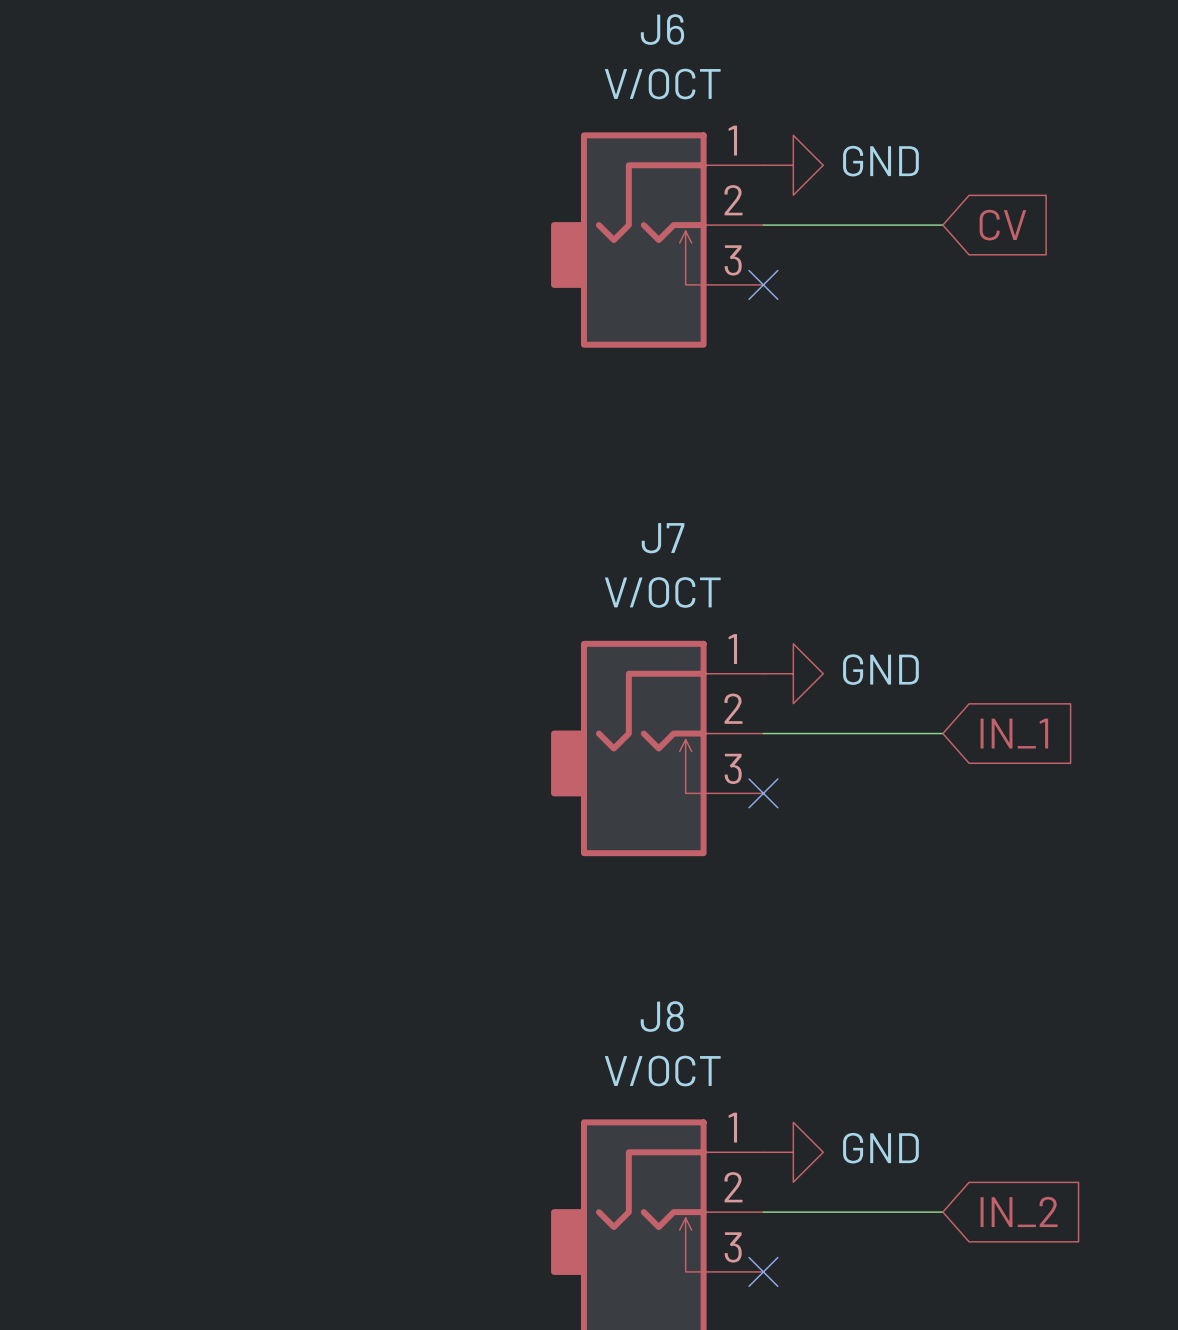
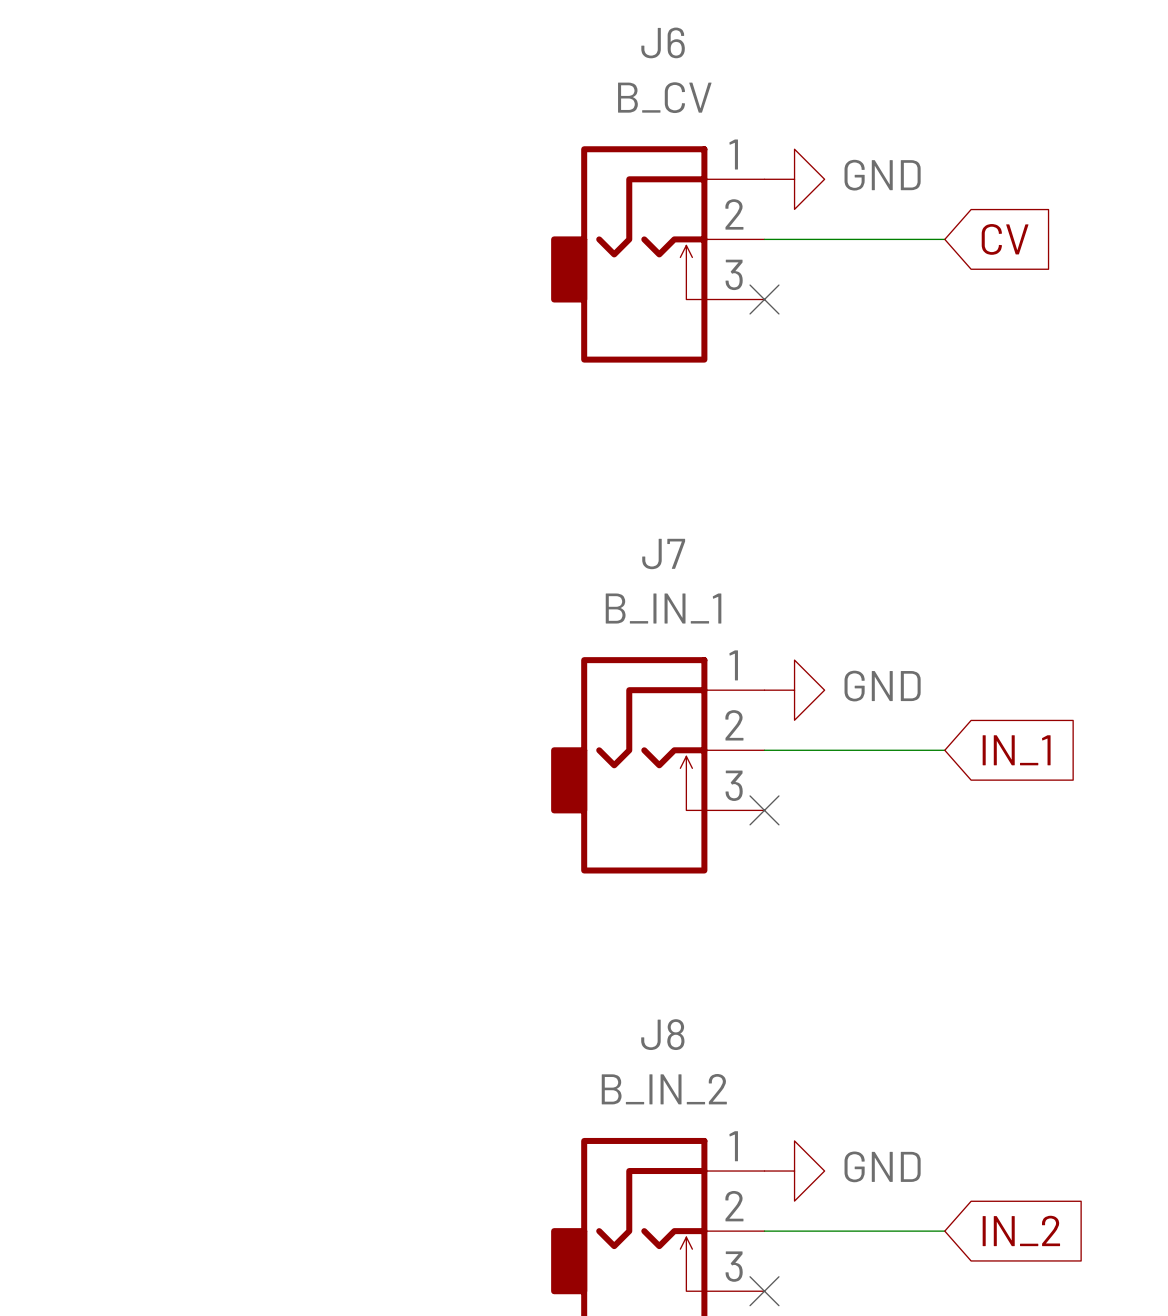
J6 value: V/OCT (662, 84) -> B_CV (664, 97)
J7 value: V/OCT (662, 592) -> B_IN_1 (663, 608)
J8 value: V/OCT (662, 1071) -> B_IN_2 (664, 1089)

